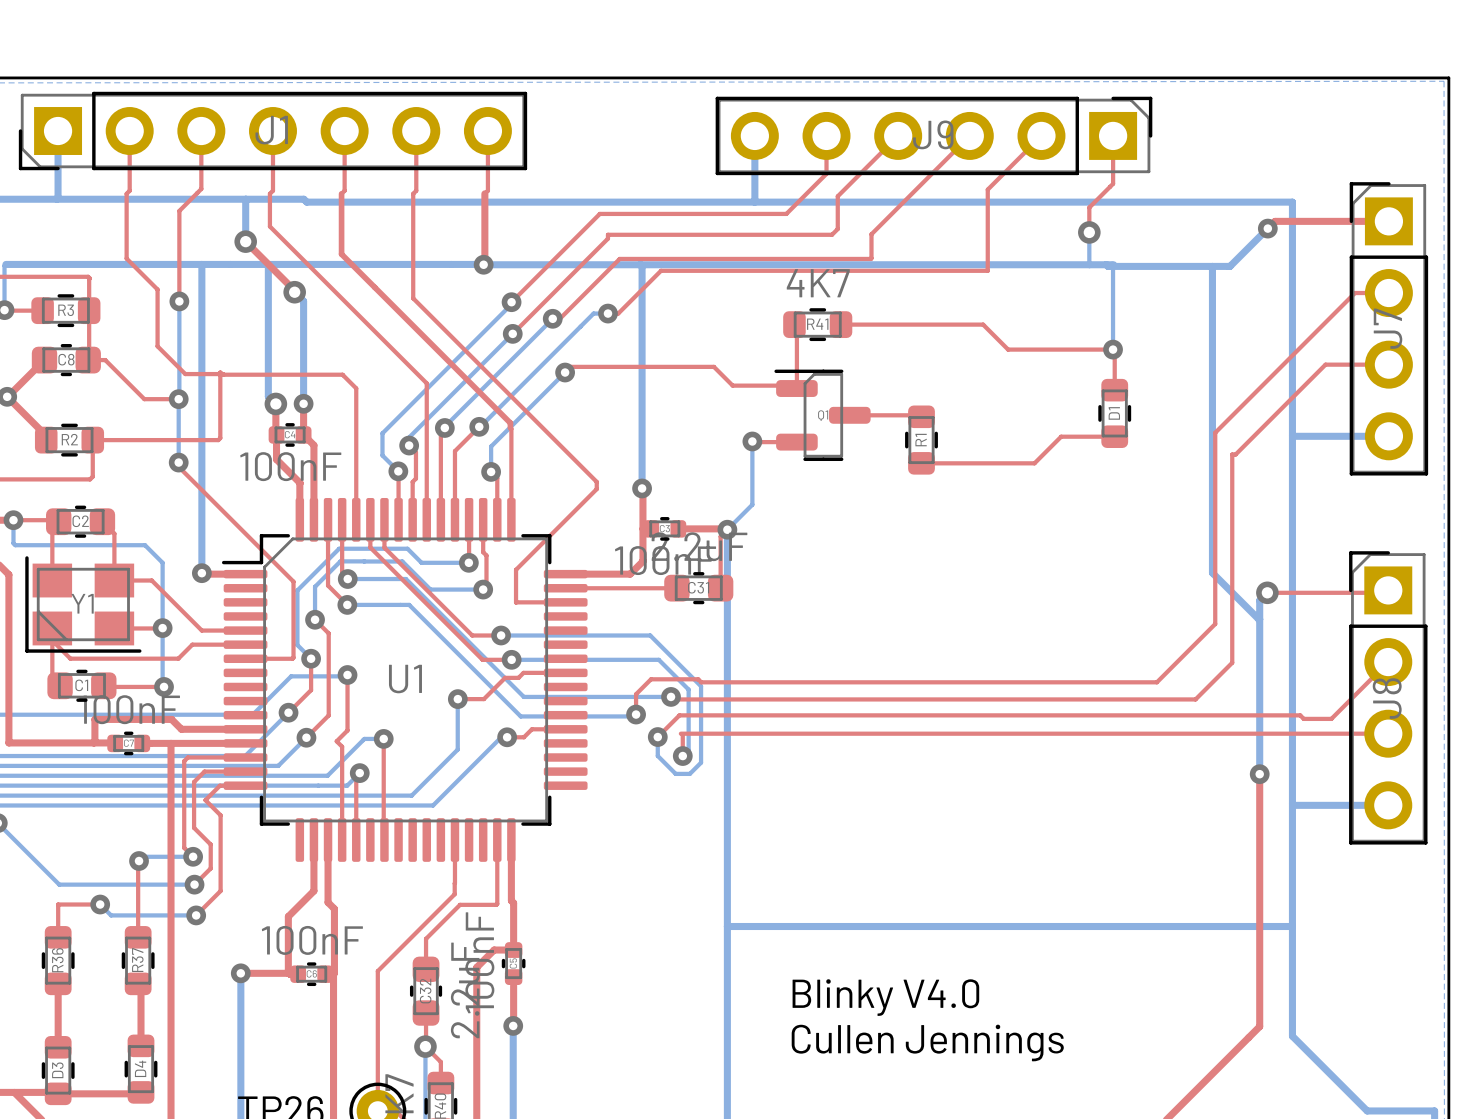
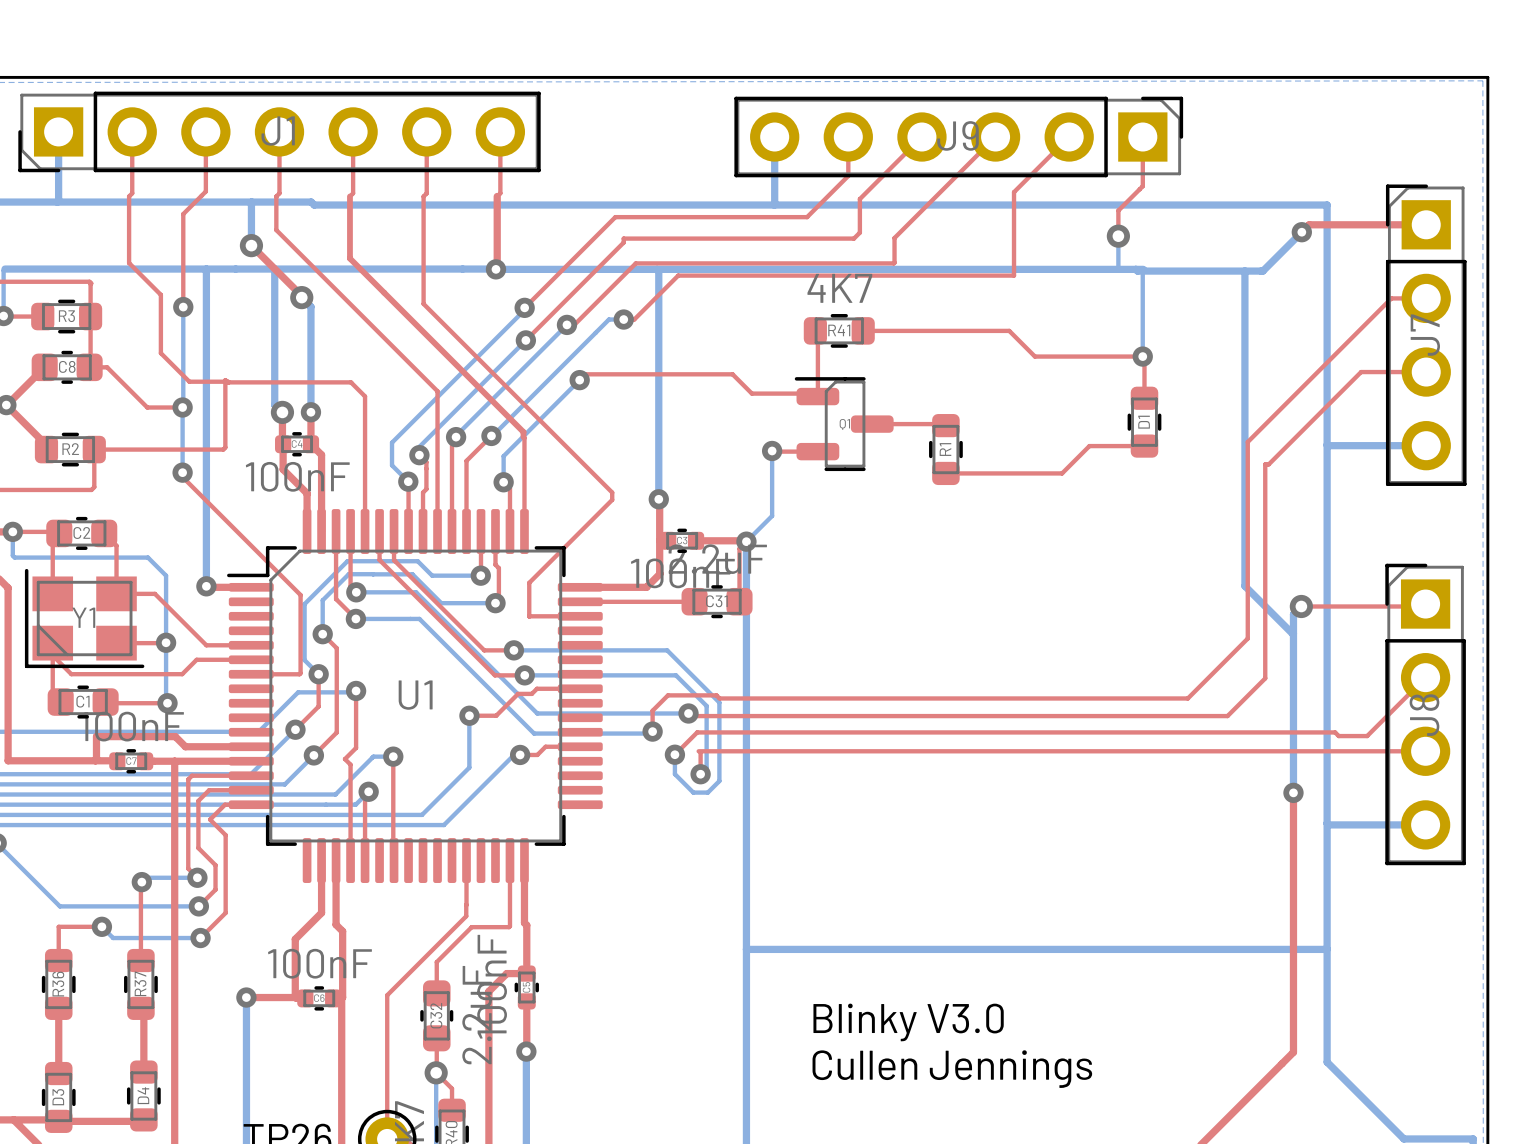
text: Blinky V4.0 (885, 997) -> Blinky V3.0 (908, 1022)

